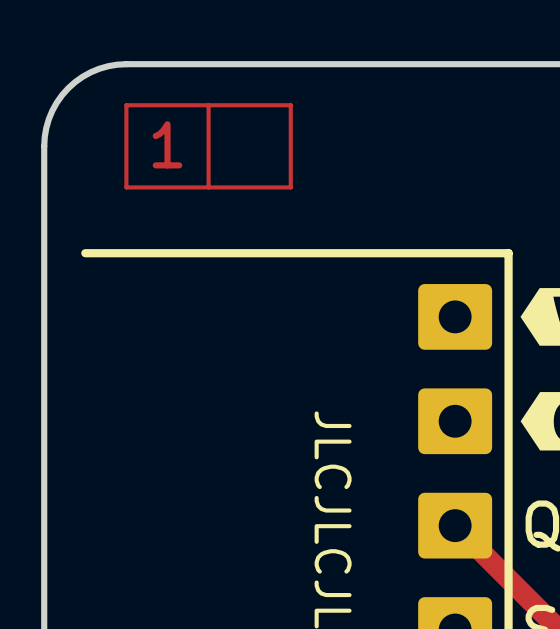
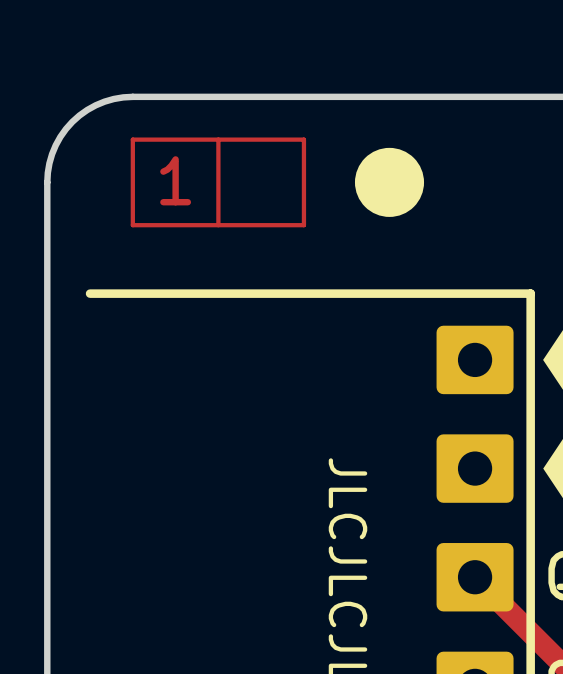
drawing: none -> [354, 147, 425, 217]

